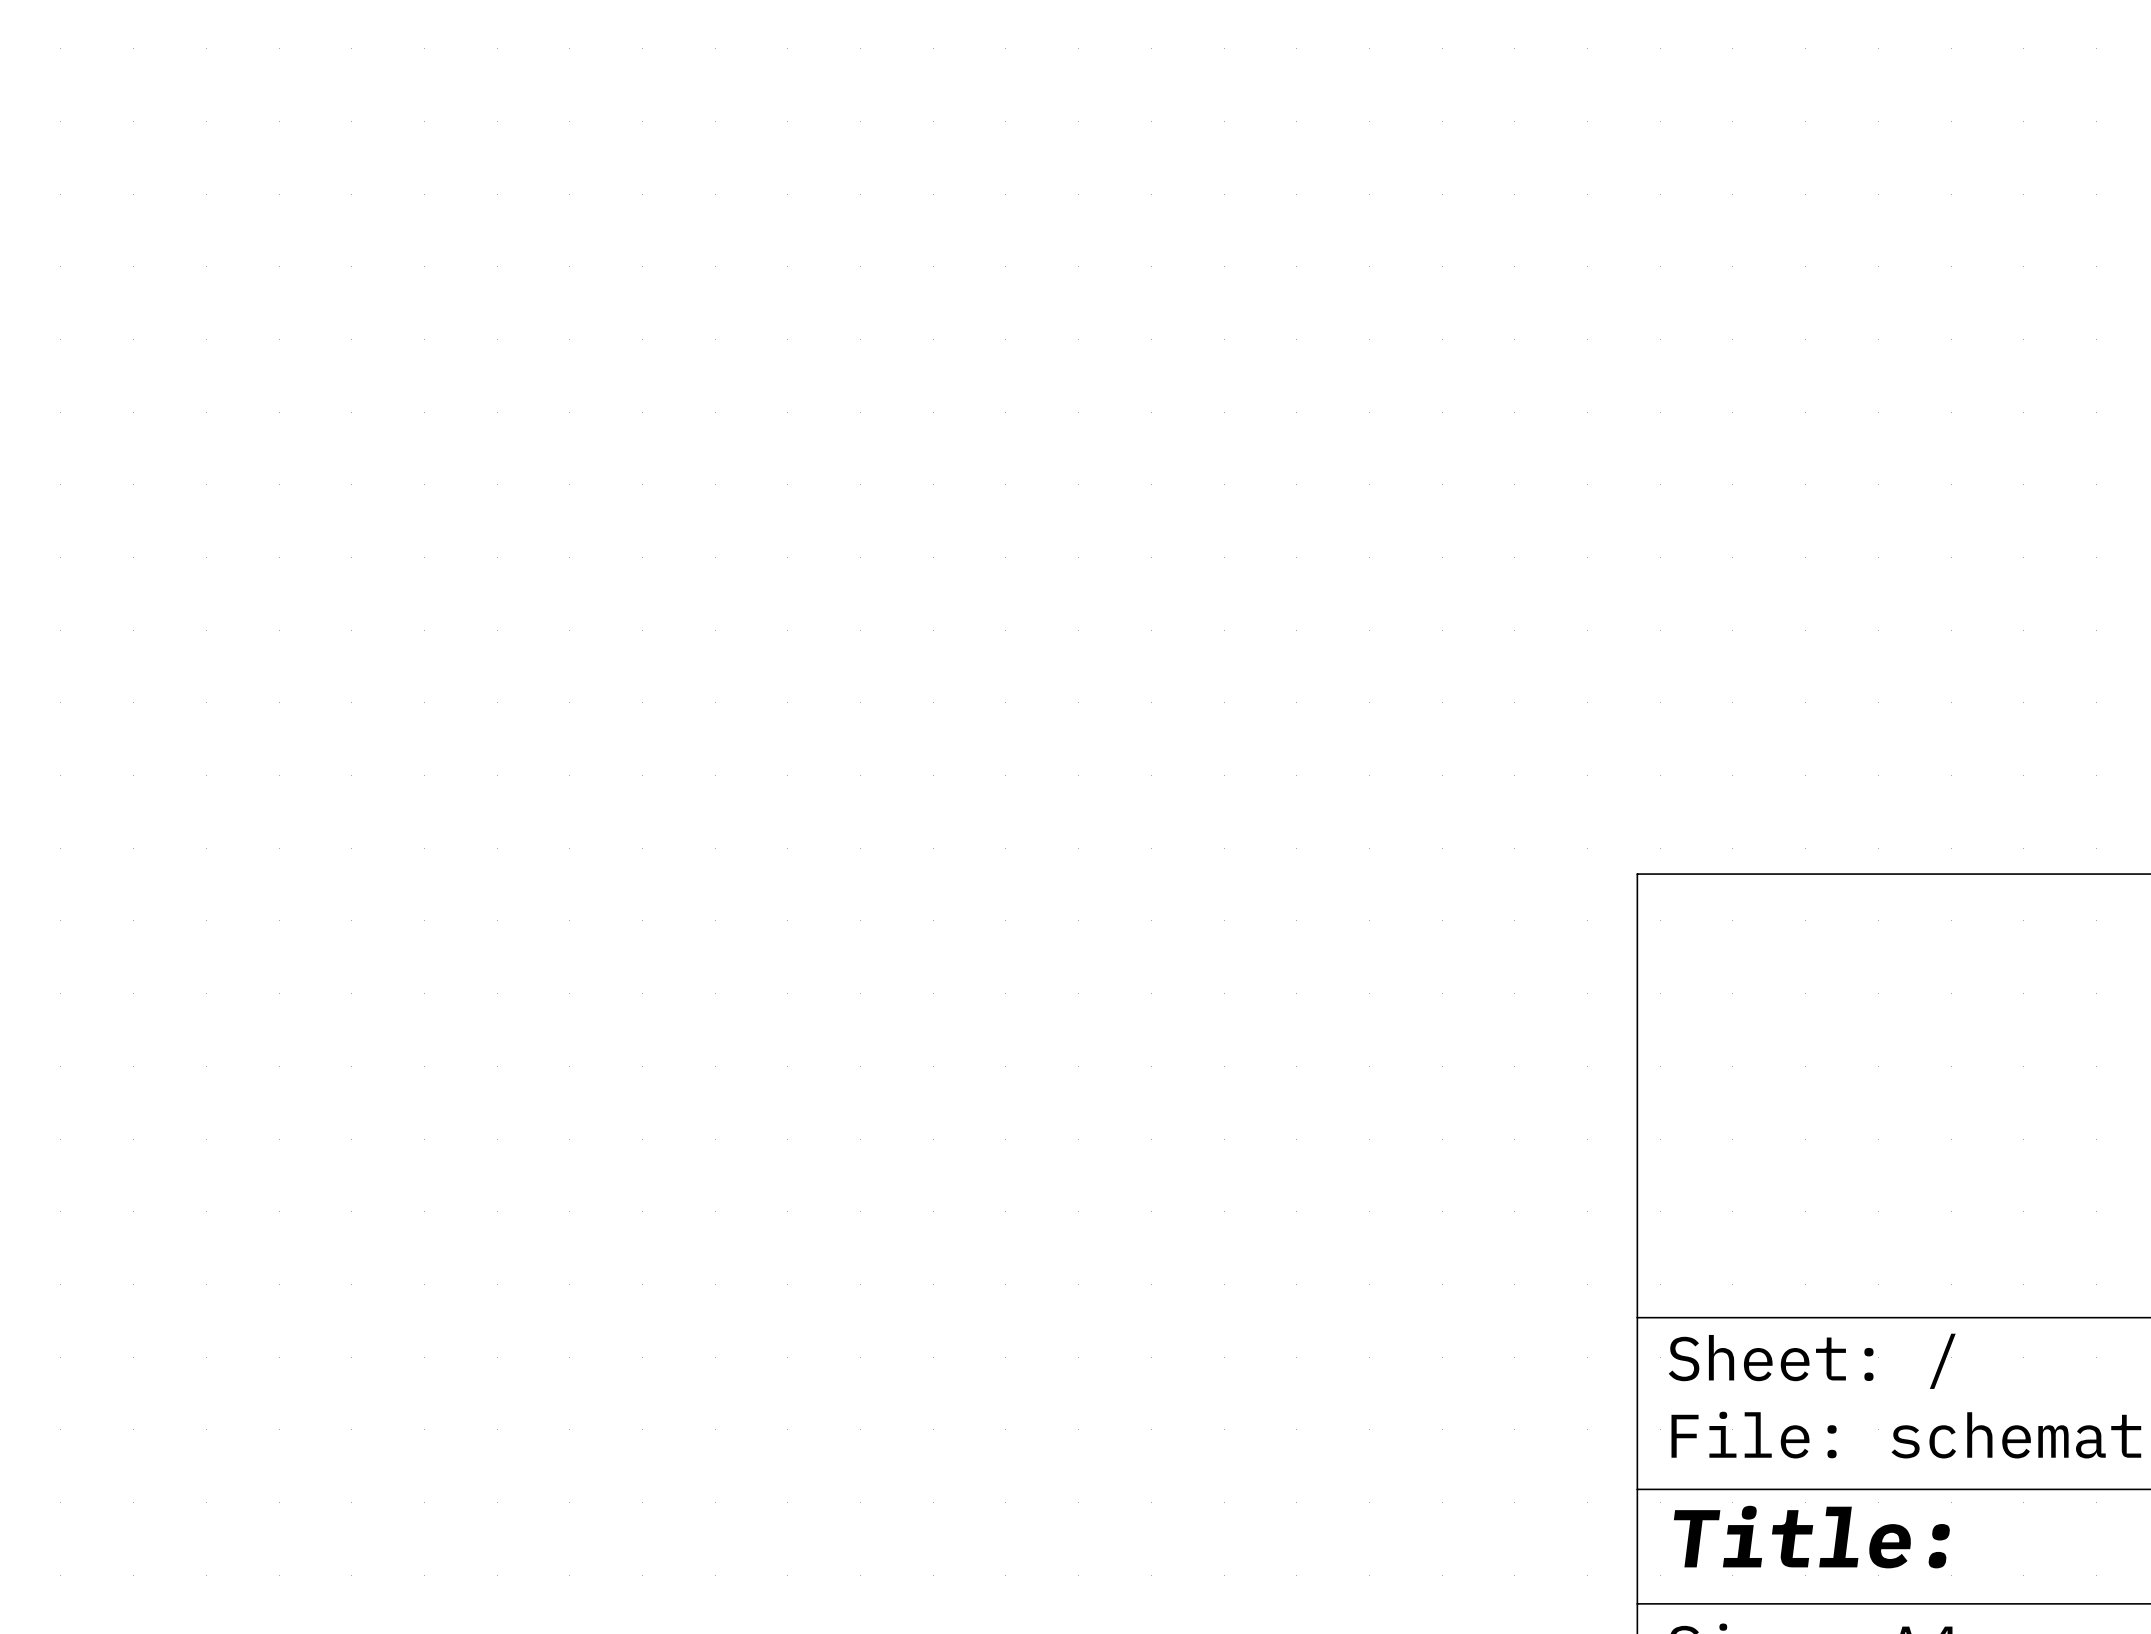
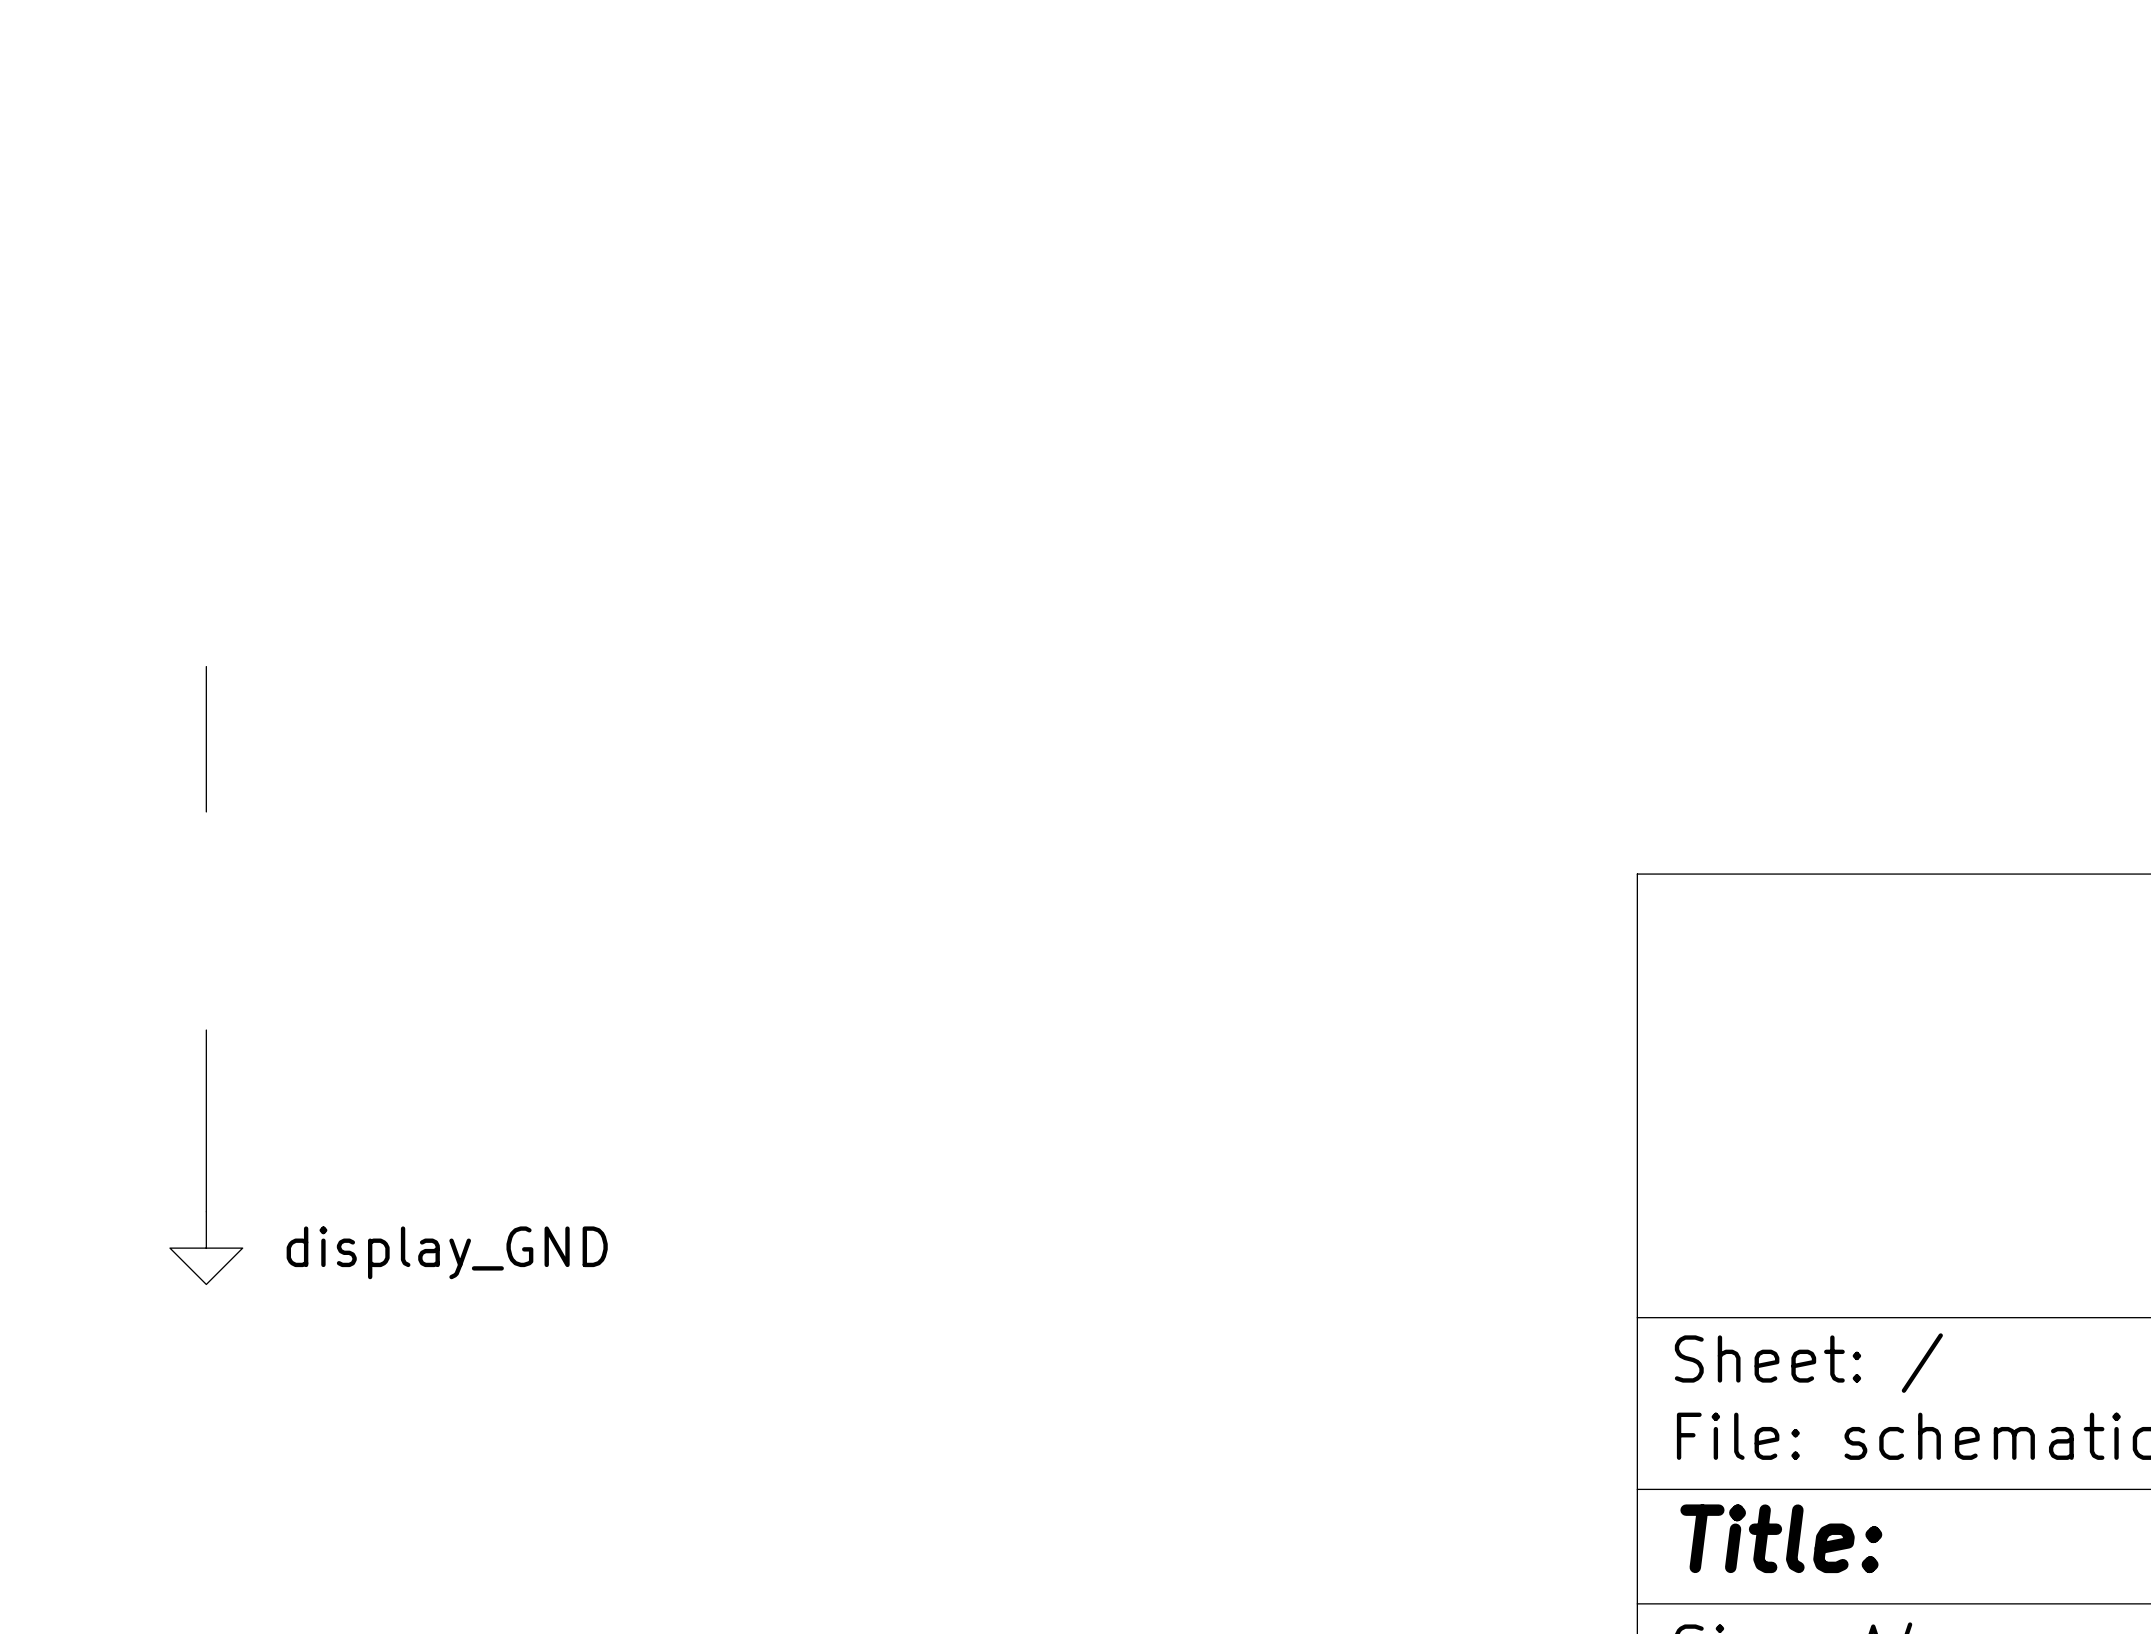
wire: none -> (206, 666) (206, 811)
wire: none -> (206, 1030) (206, 1211)
power symbol: none -> display_GND (206, 1248)

